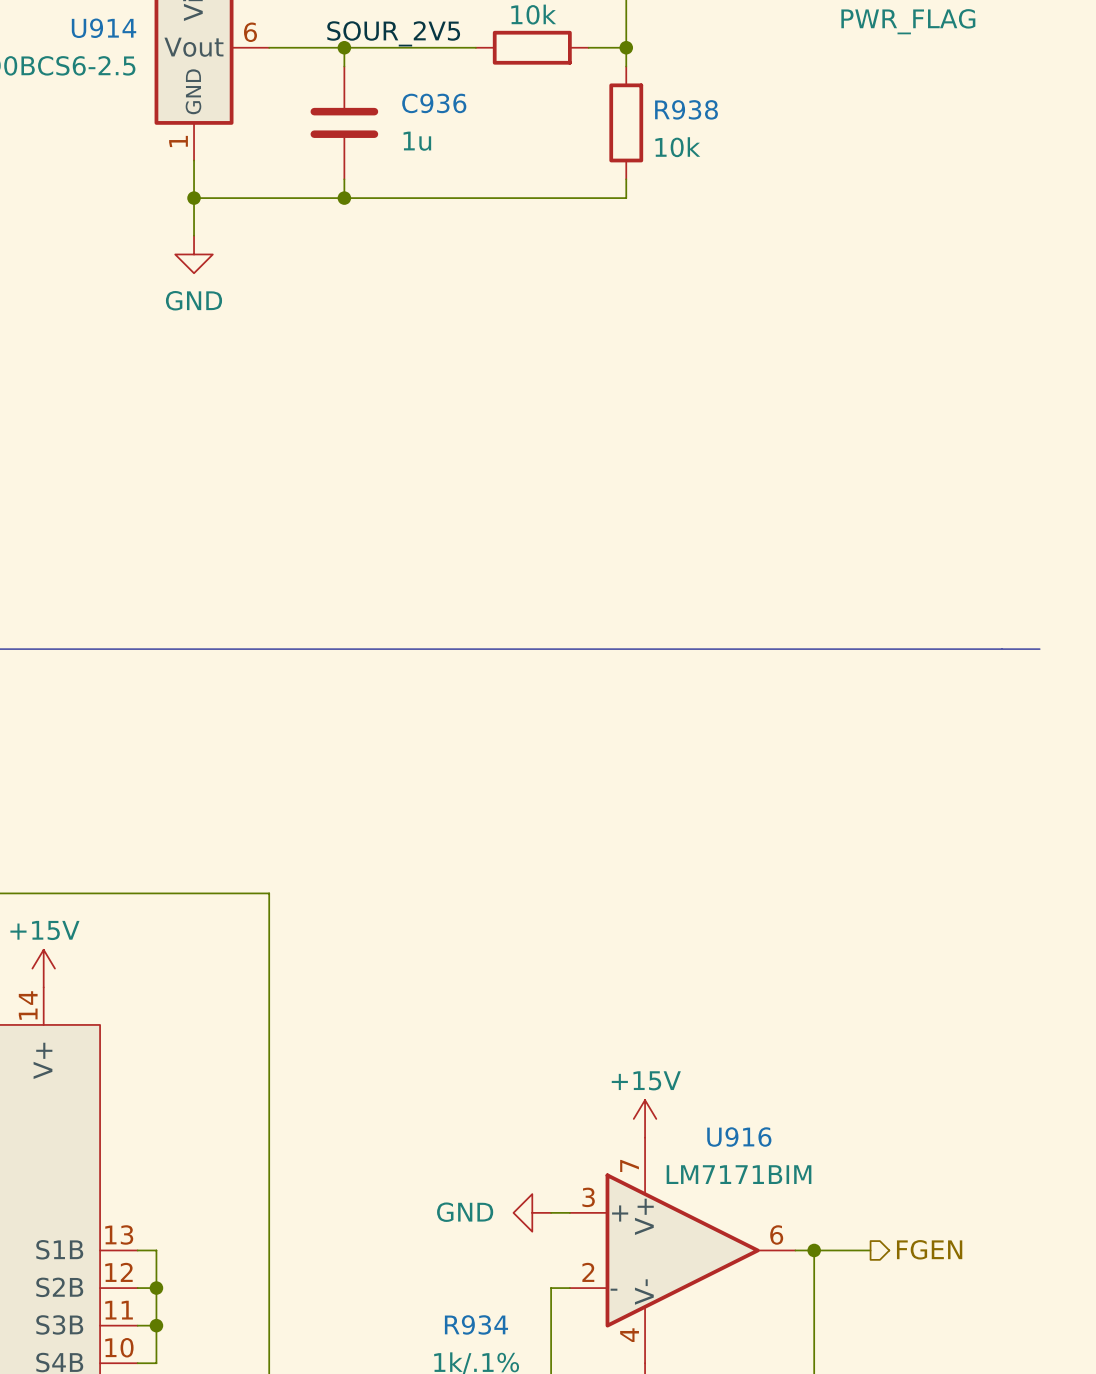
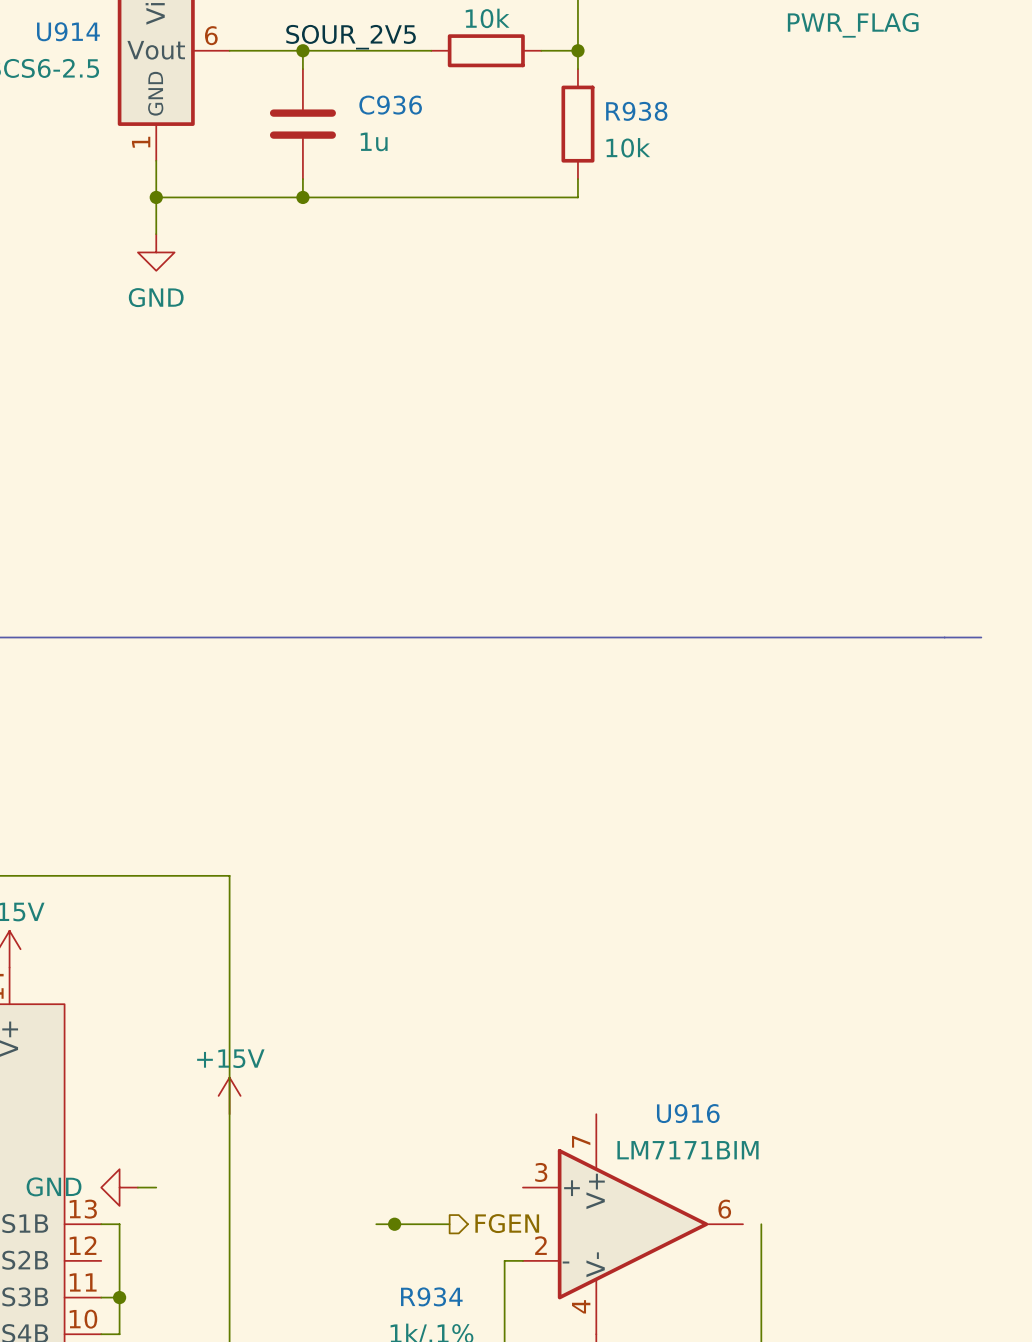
power symbol: none -> +15V (229, 1095)
power symbol: +15V (645, 1118) -> none
power symbol: none -> GND (119, 1187)
power symbol: GND (532, 1212) -> none
wire: (551, 1212) (569, 1212) -> none
hierarchical label: none -> FGEN (507, 1223)
hierarchical label: FGEN (929, 1249) -> none
wire: none -> (376, 1224) (449, 1224)
junction: none -> (394, 1224)
wire: (795, 1250) (870, 1250) -> none
junction: (814, 1250) -> none
wire: (137, 1288) (156, 1288) -> (137, 1187) (156, 1187)
junction: (156, 1288) -> none

